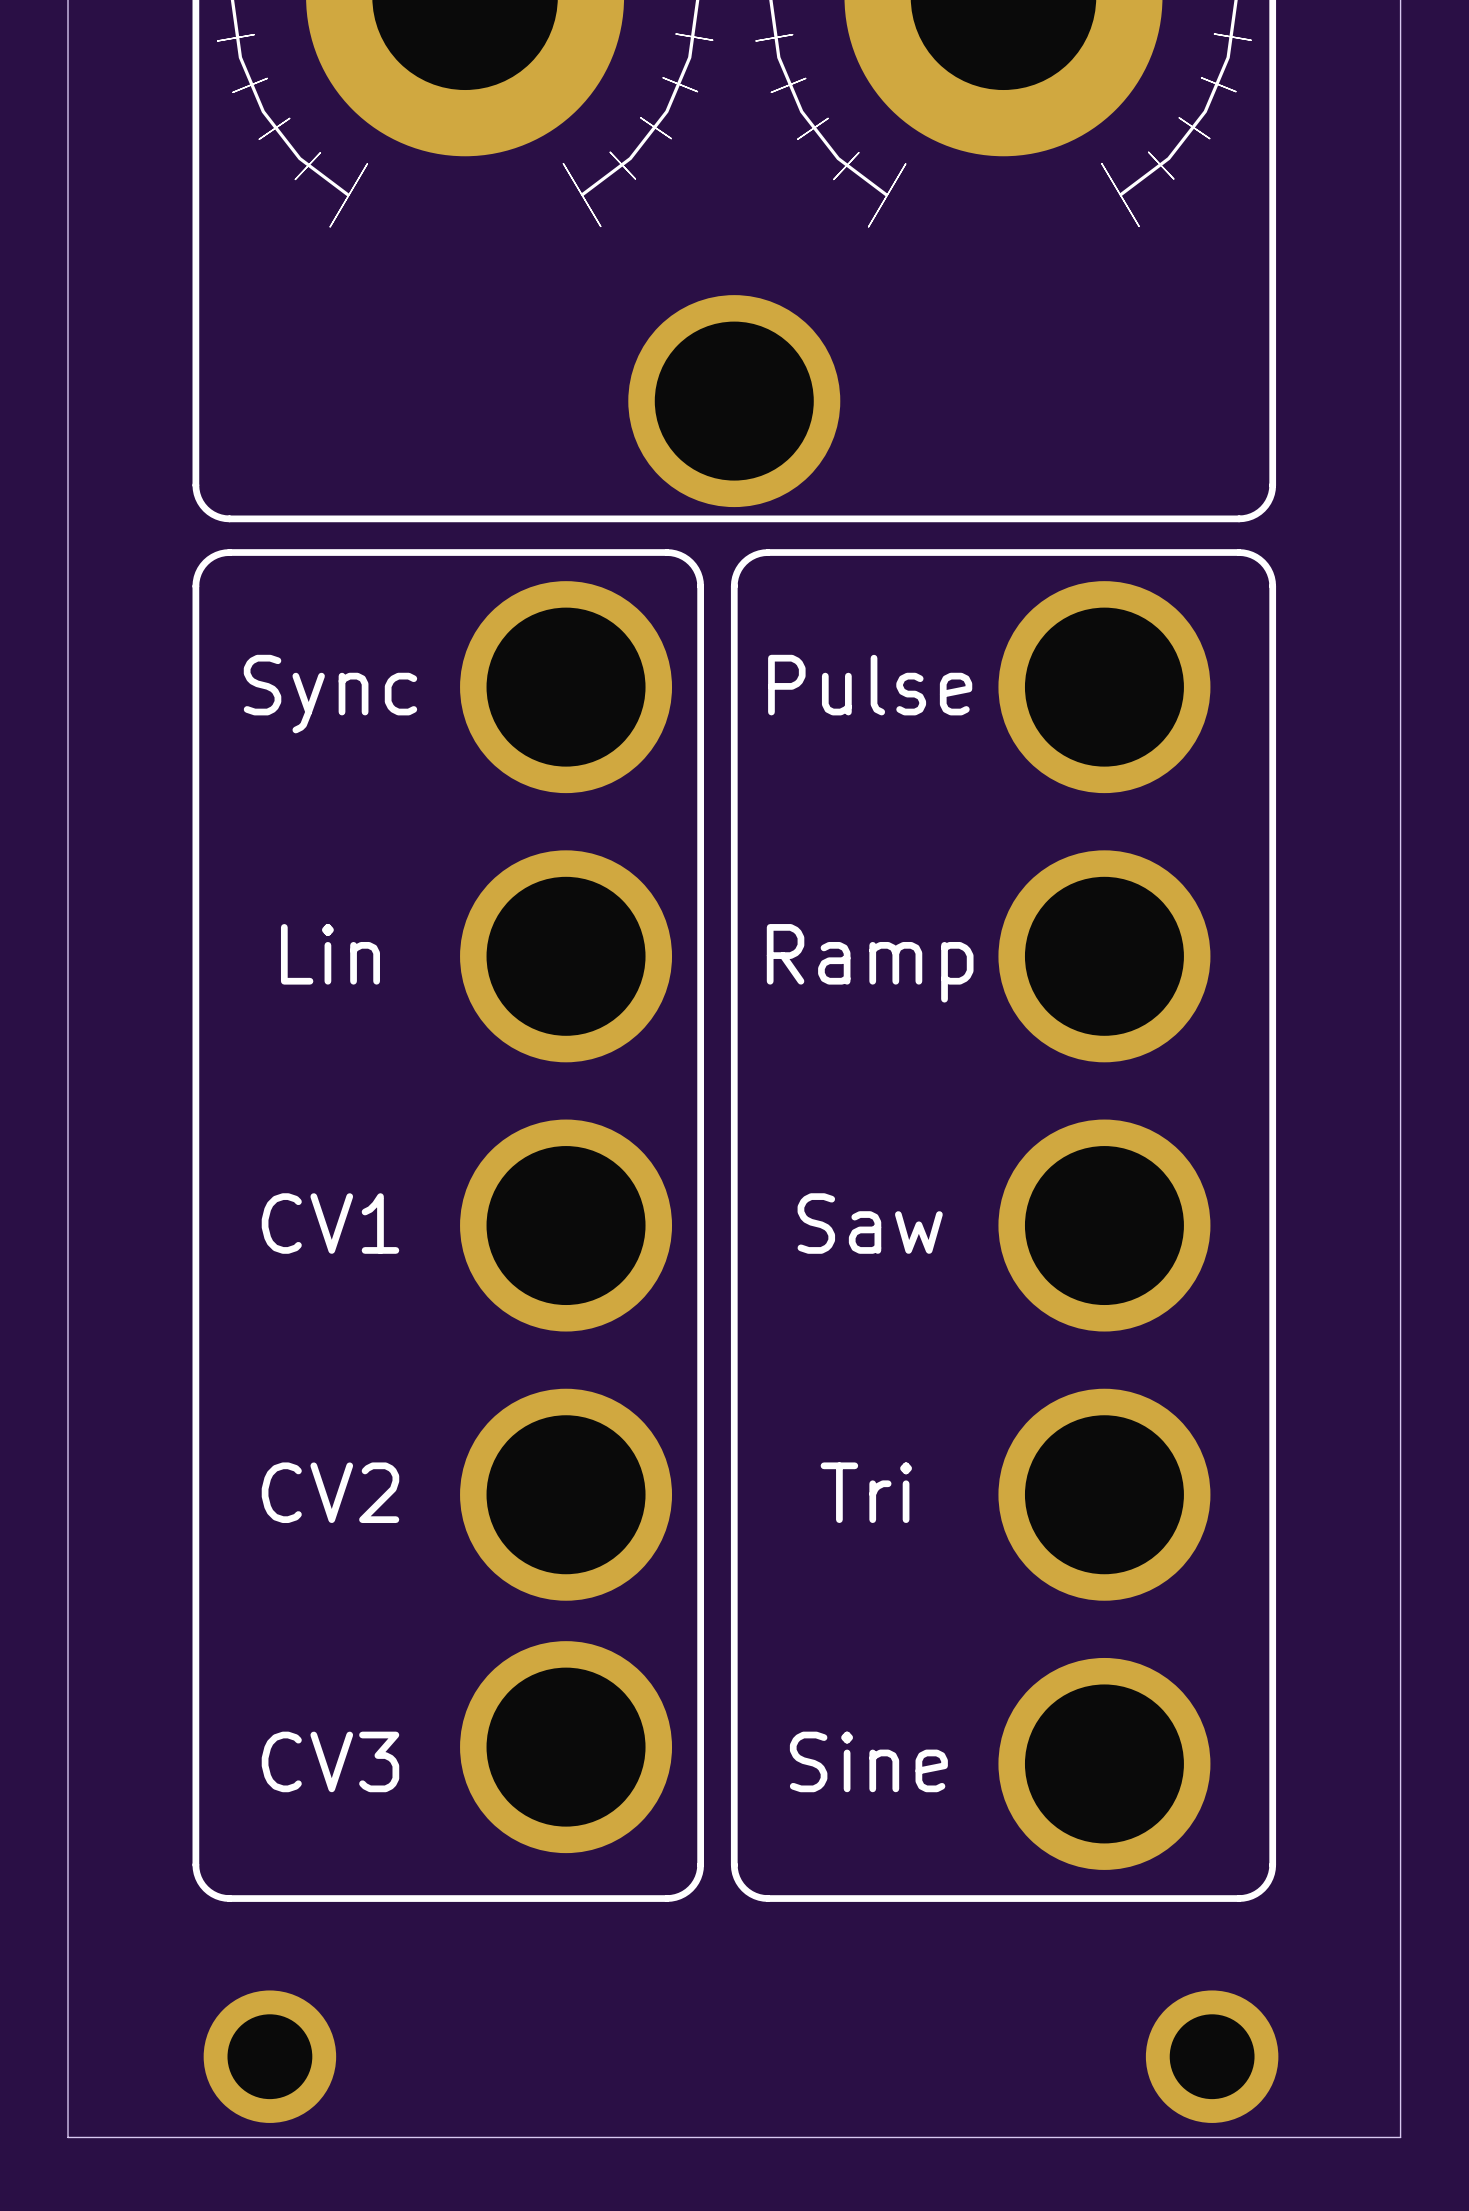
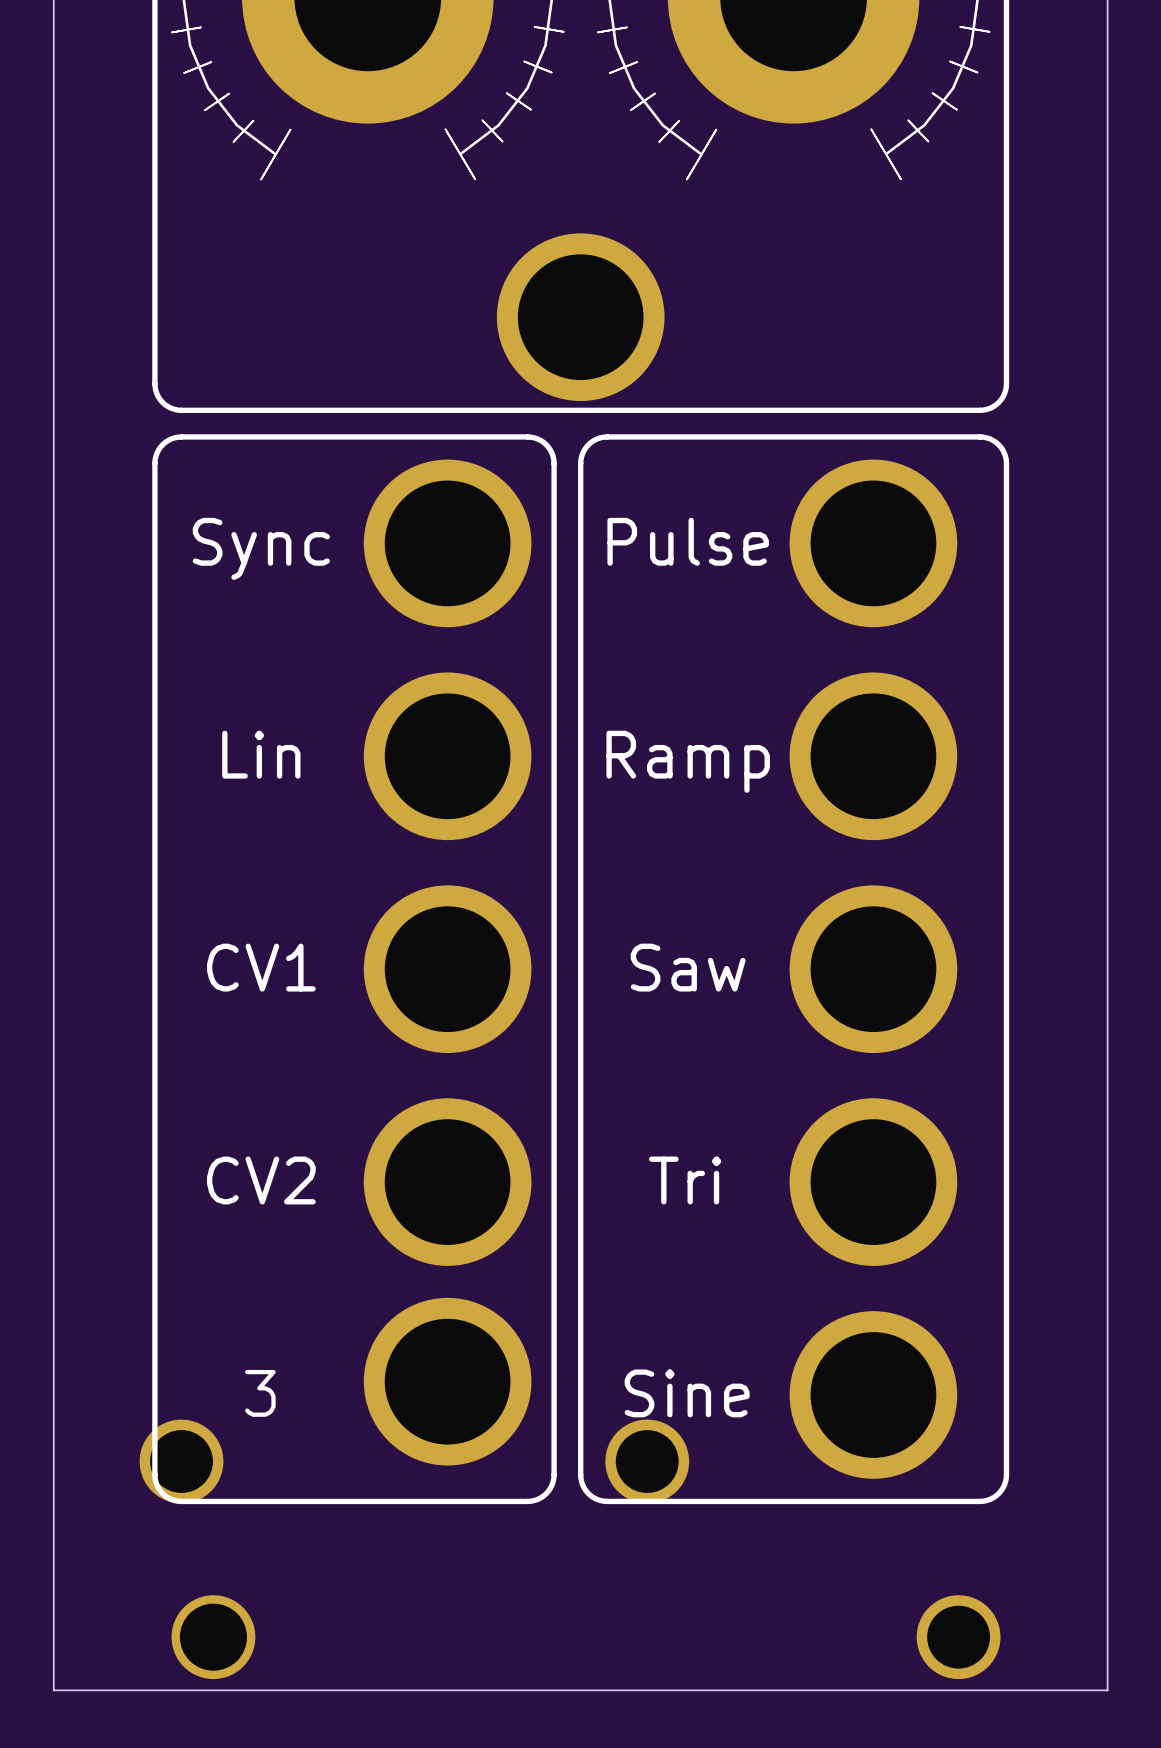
text: CV3 (330, 1761) -> 3 (260, 1393)
via: none -> (181, 1461)
via: none -> (647, 1461)
via size: [203, 1990, 337, 2123] -> [171, 1595, 256, 1680]
via size: [1145, 1990, 1279, 2123] -> [916, 1595, 1001, 1680]

